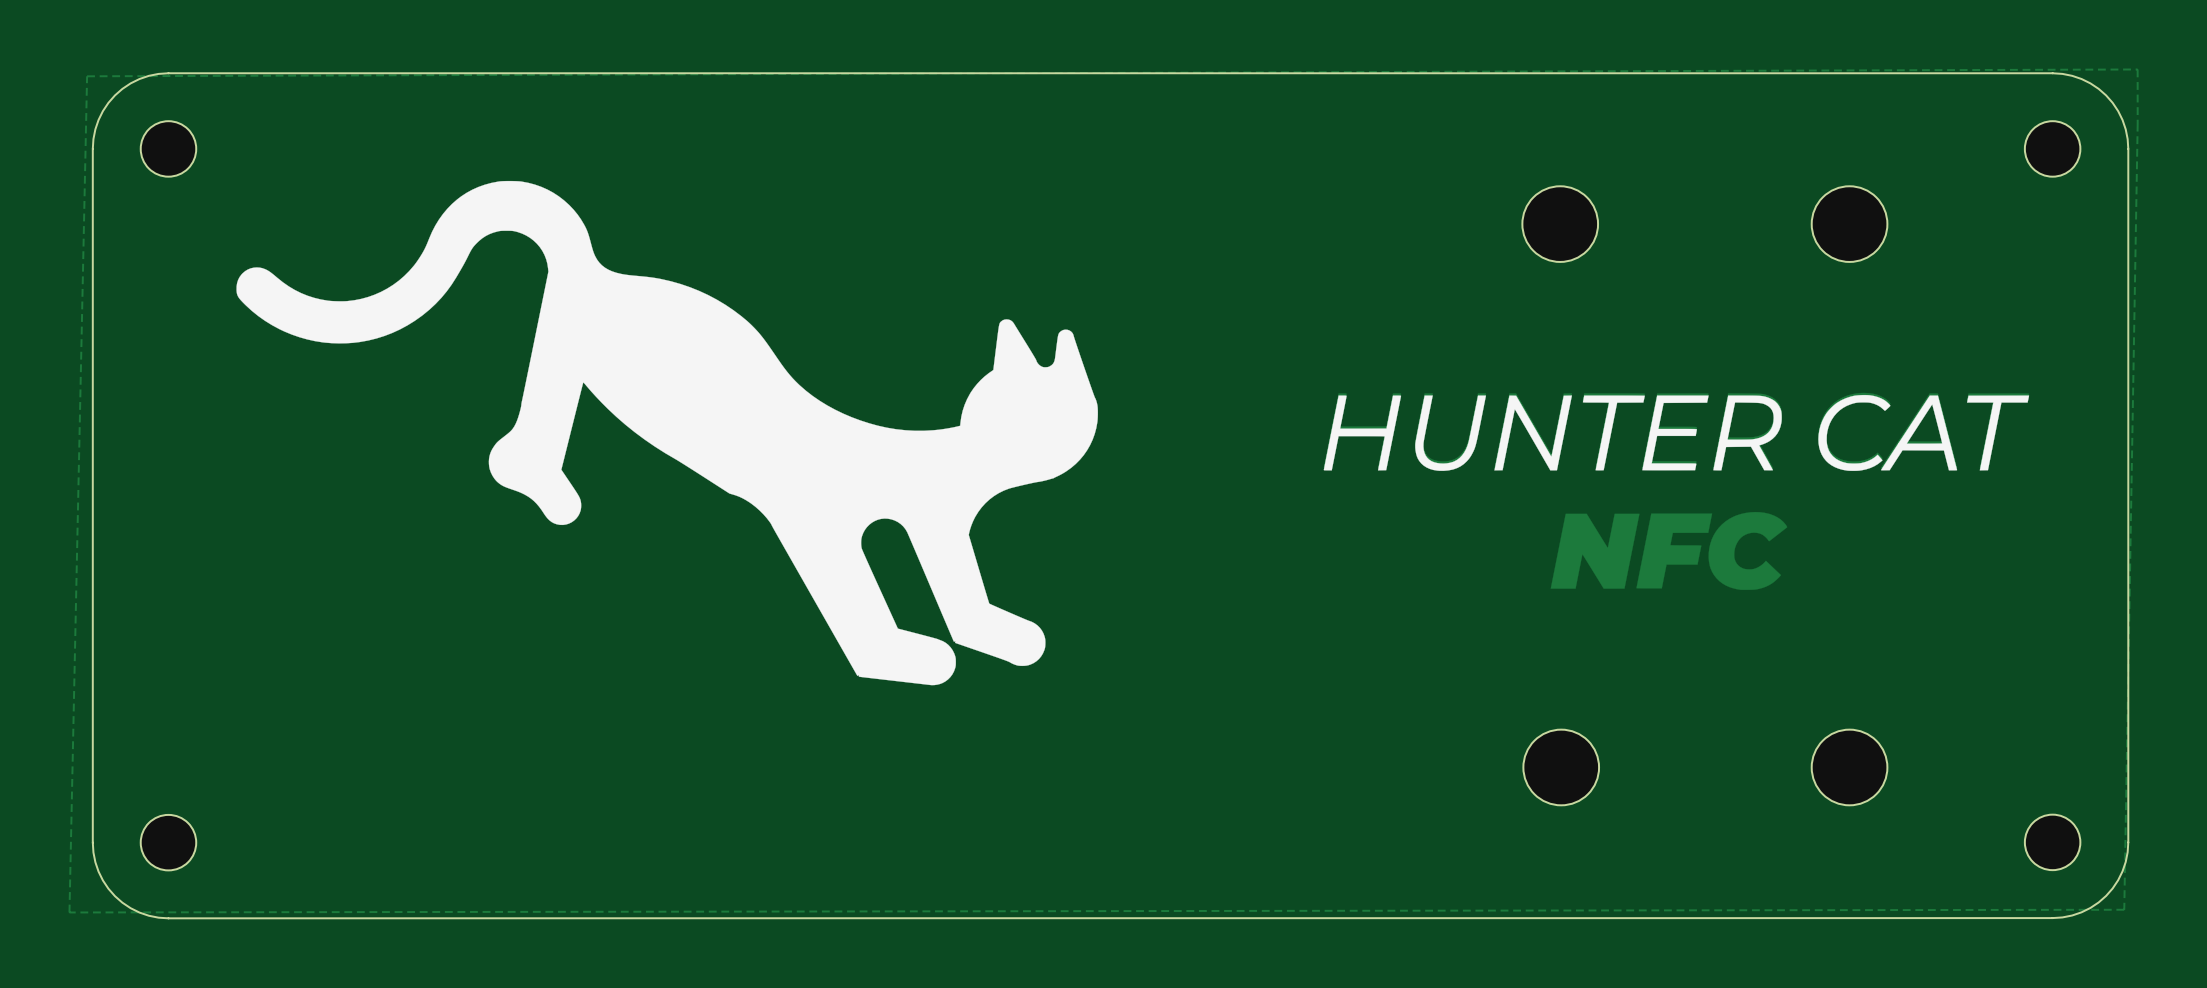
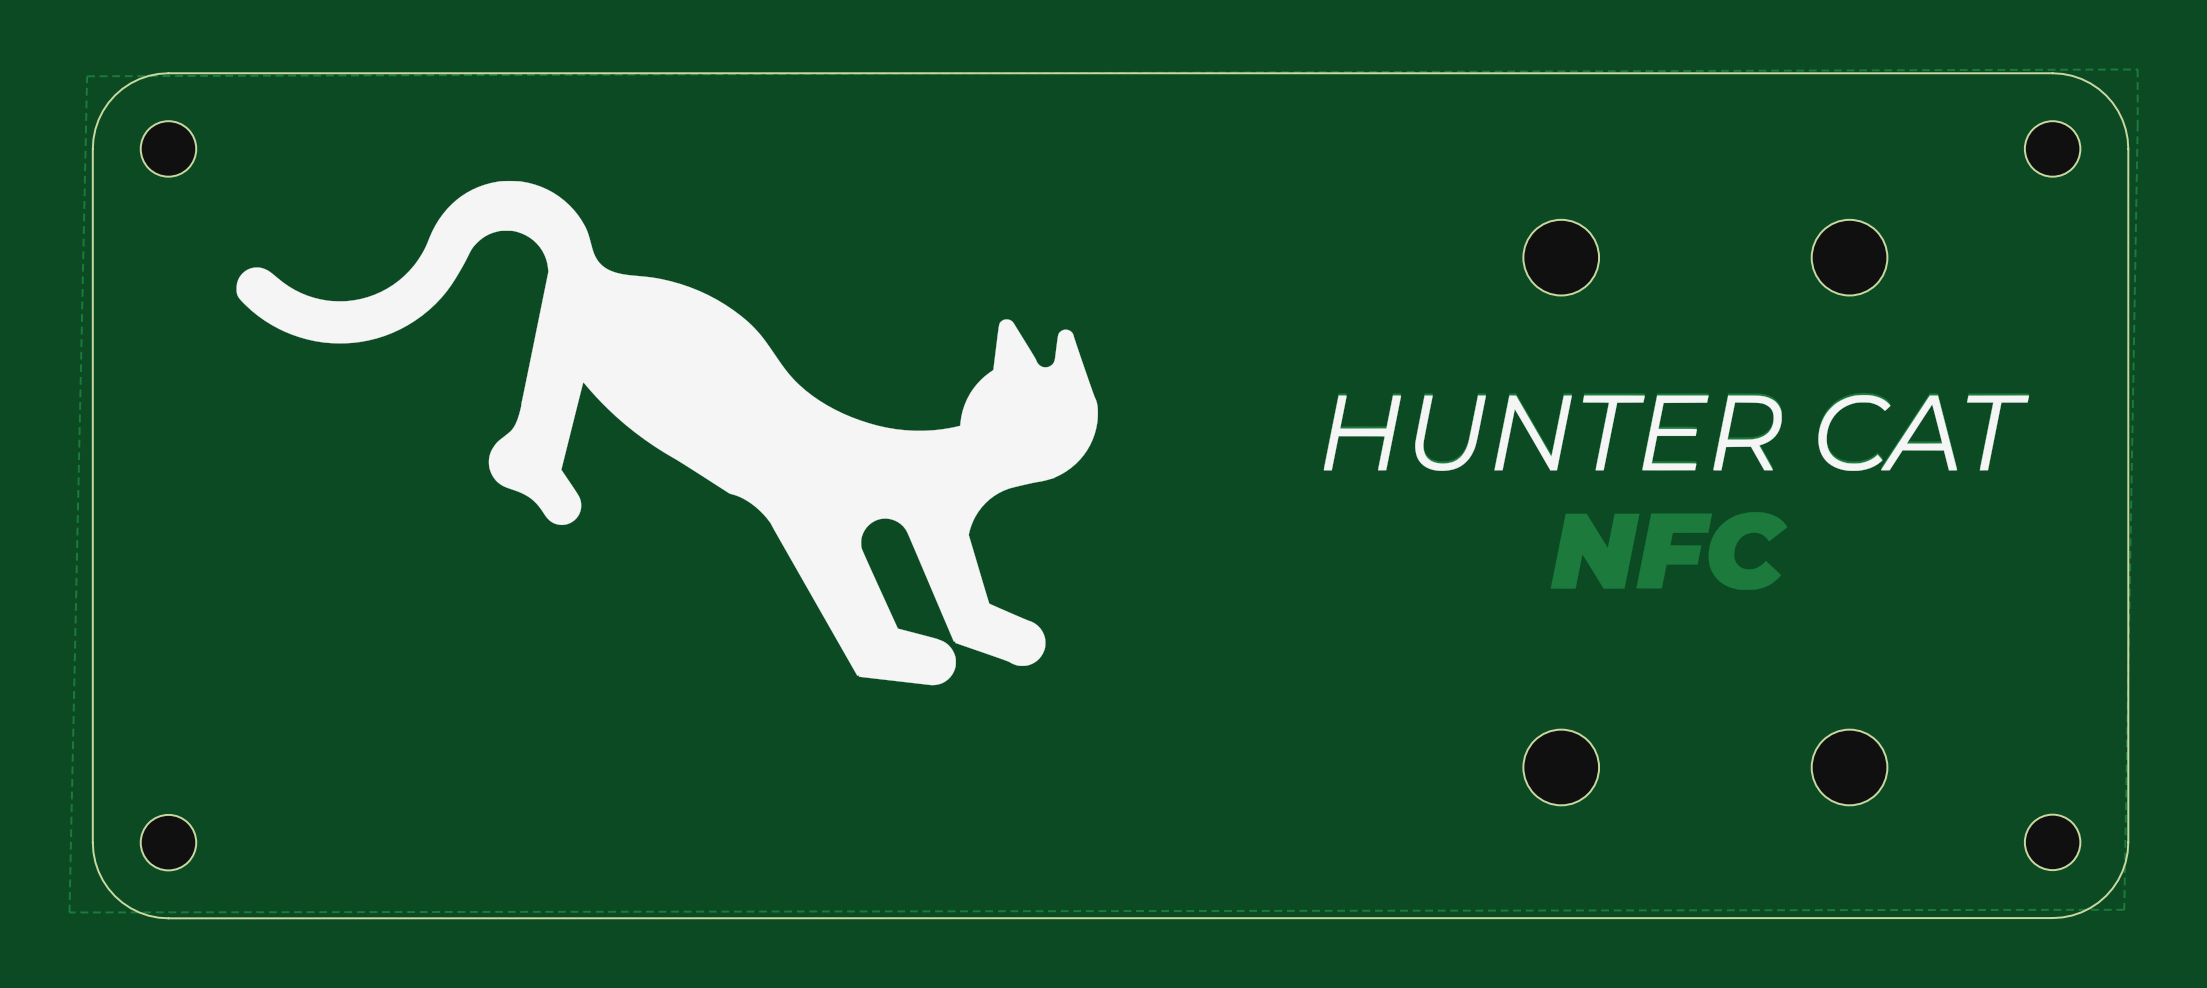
part position: (1560, 224) -> (1561, 257)
part position: (1849, 224) -> (1849, 257)

